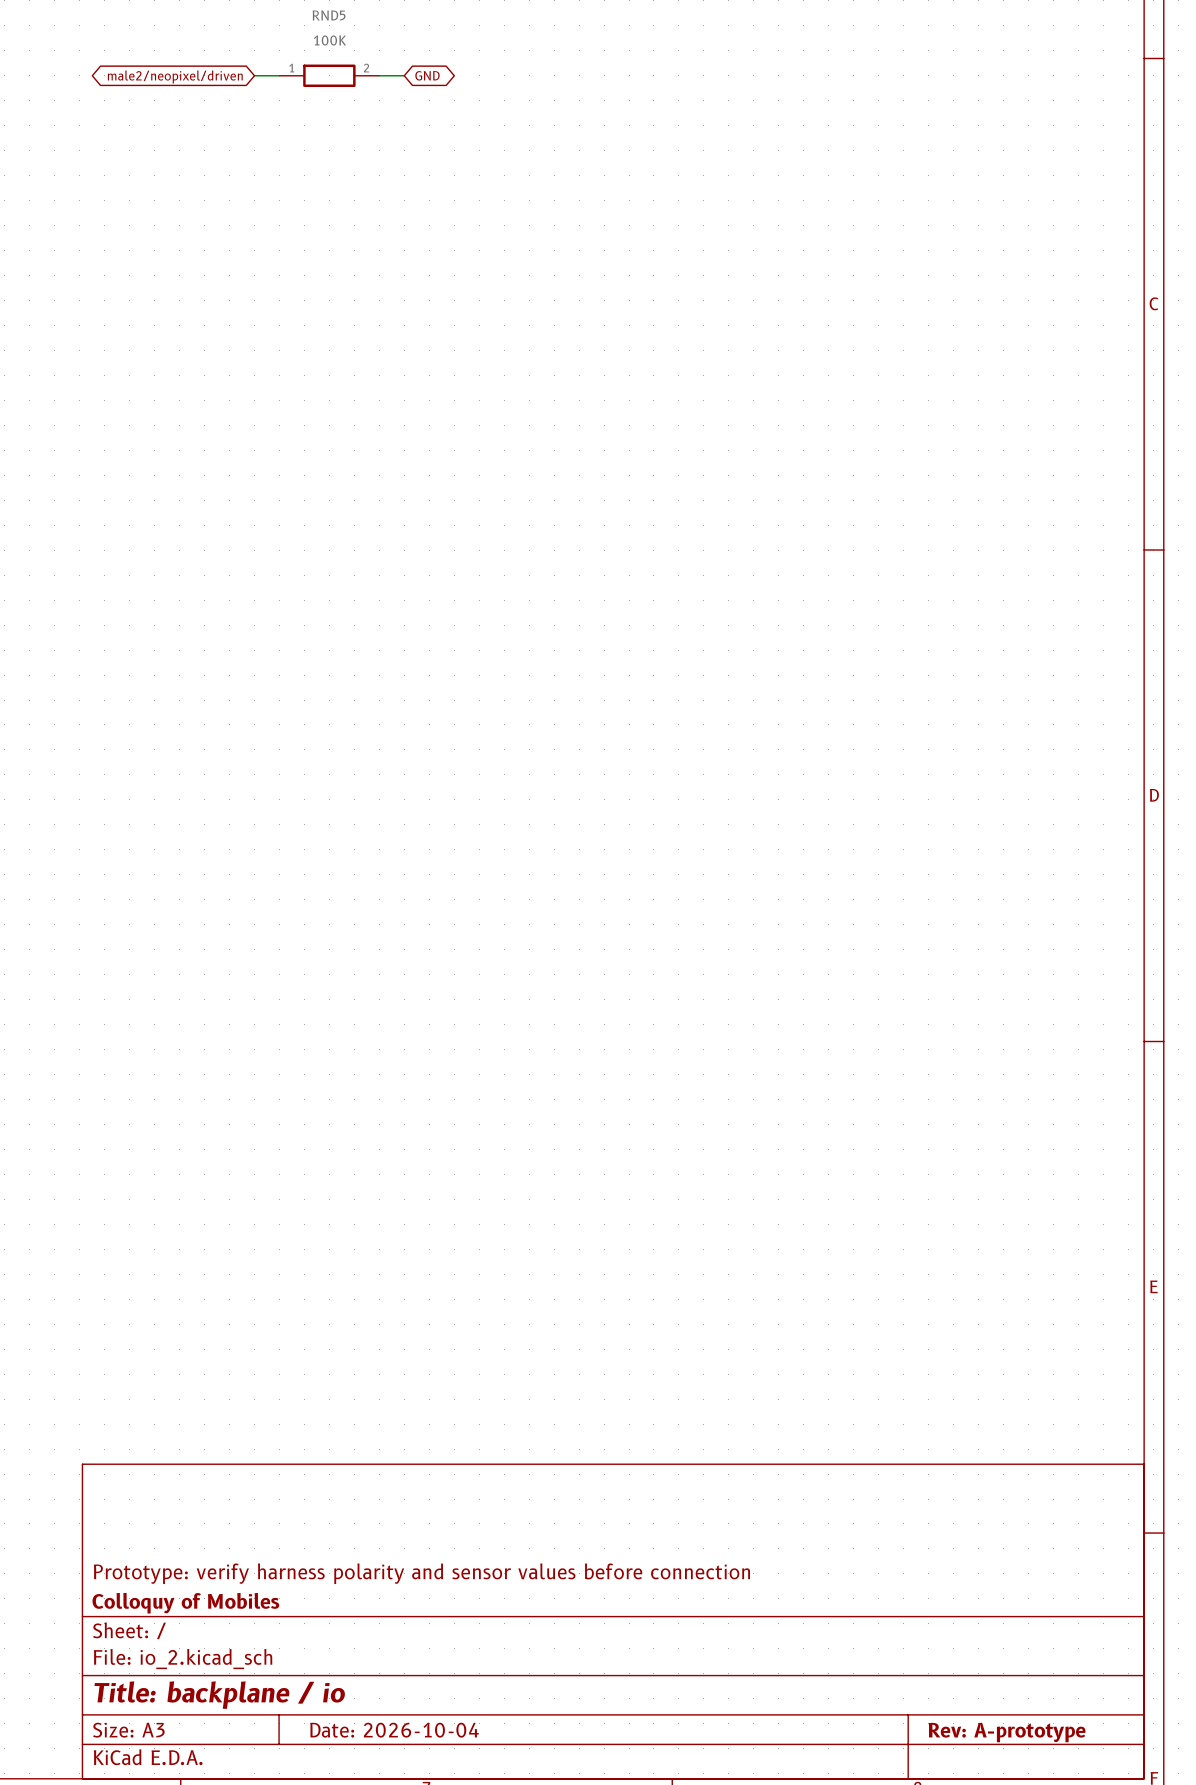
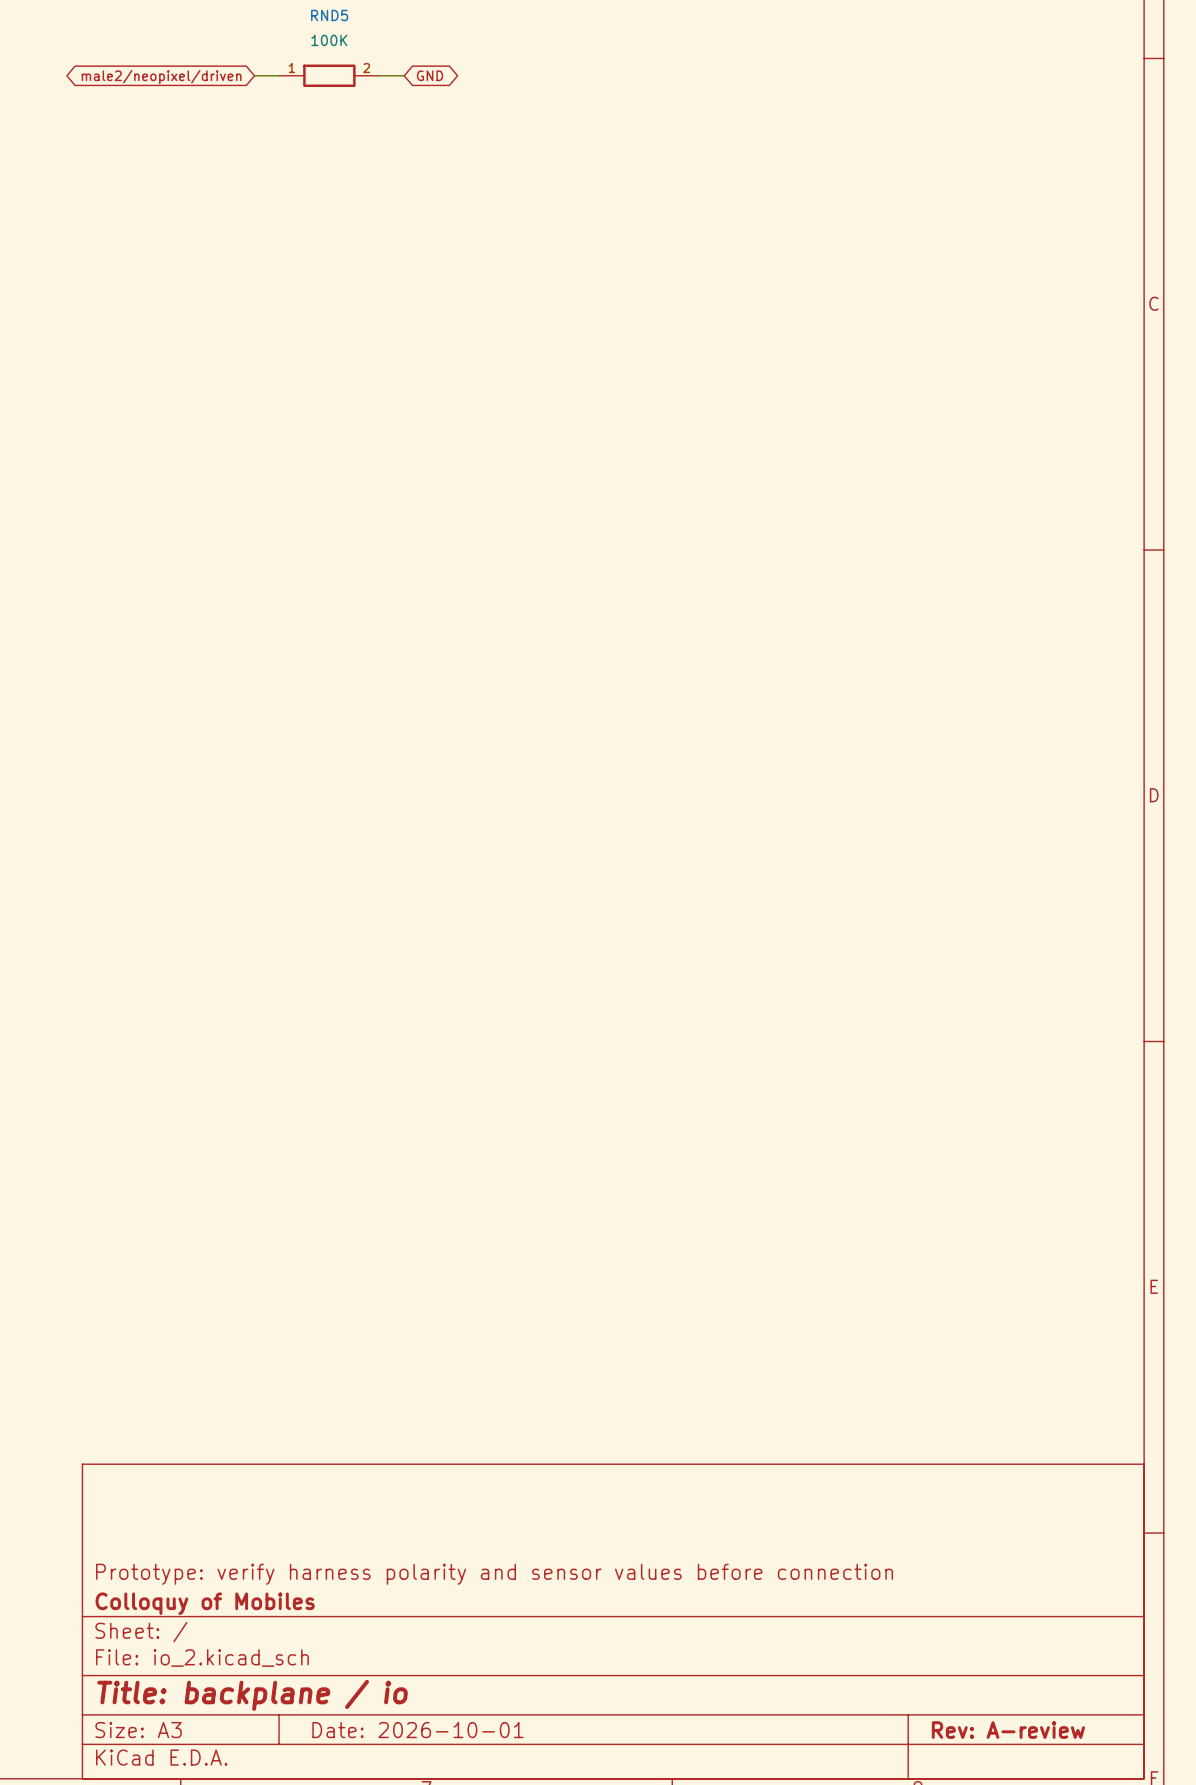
title block: Date: 2026-10-04 (394, 1730) -> Date: 2026-10-01 (418, 1730)
title block: Rev: A-prototype (1007, 1732) -> Rev: A-review (1008, 1730)

